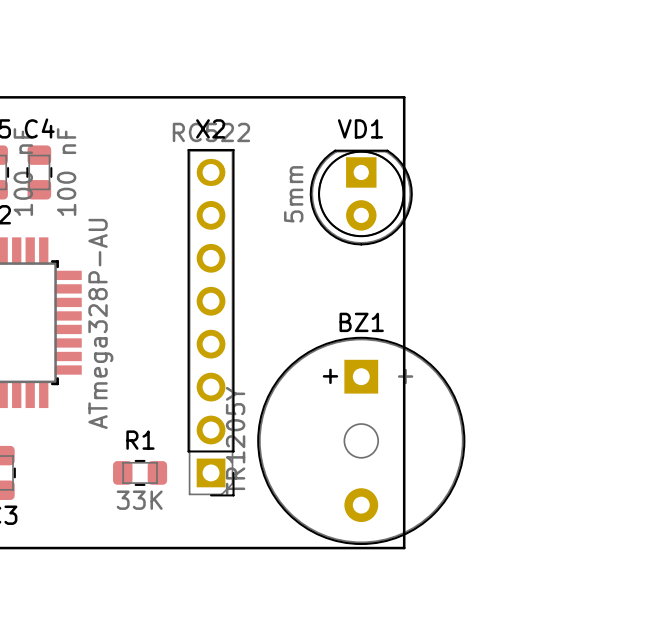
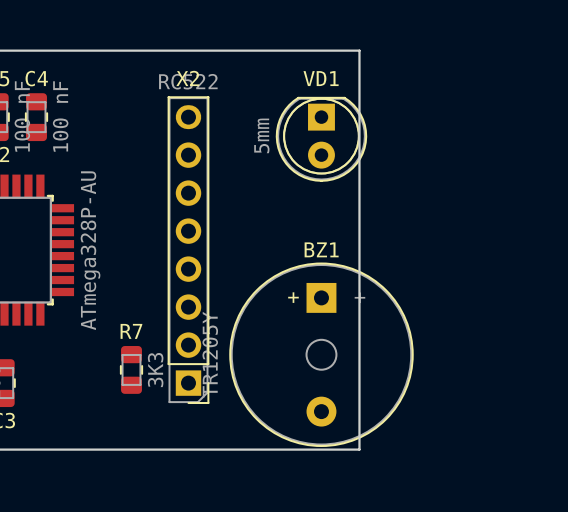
R7: none -> 3K3 (131, 369)
R1: 33K (140, 472) -> none

